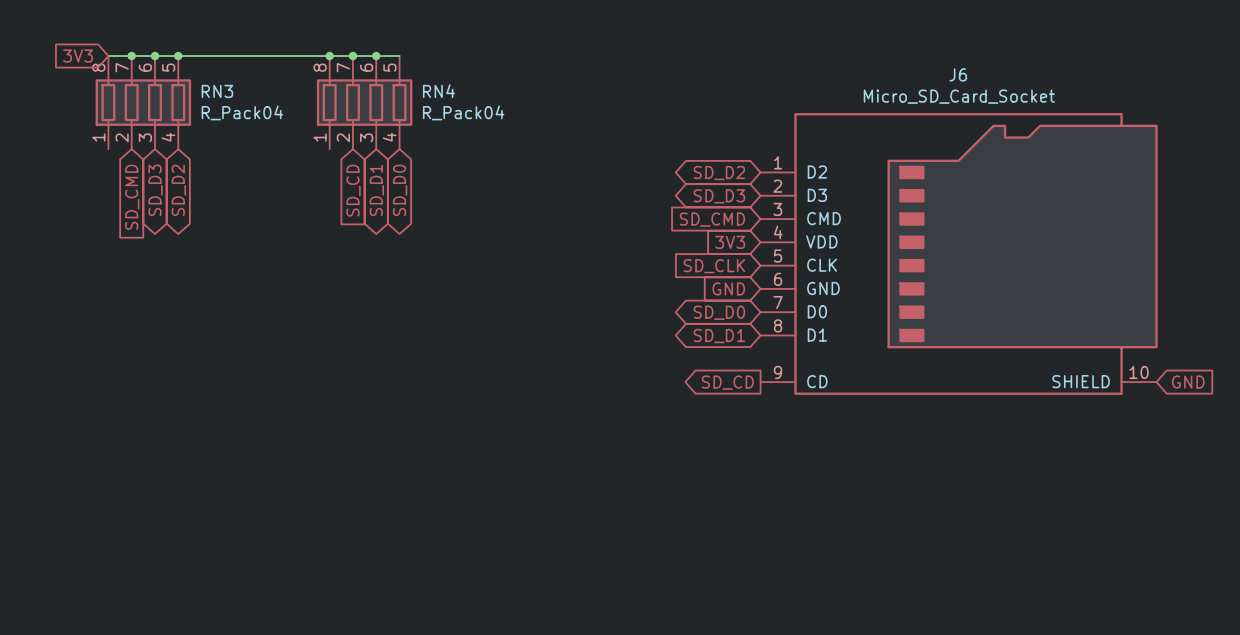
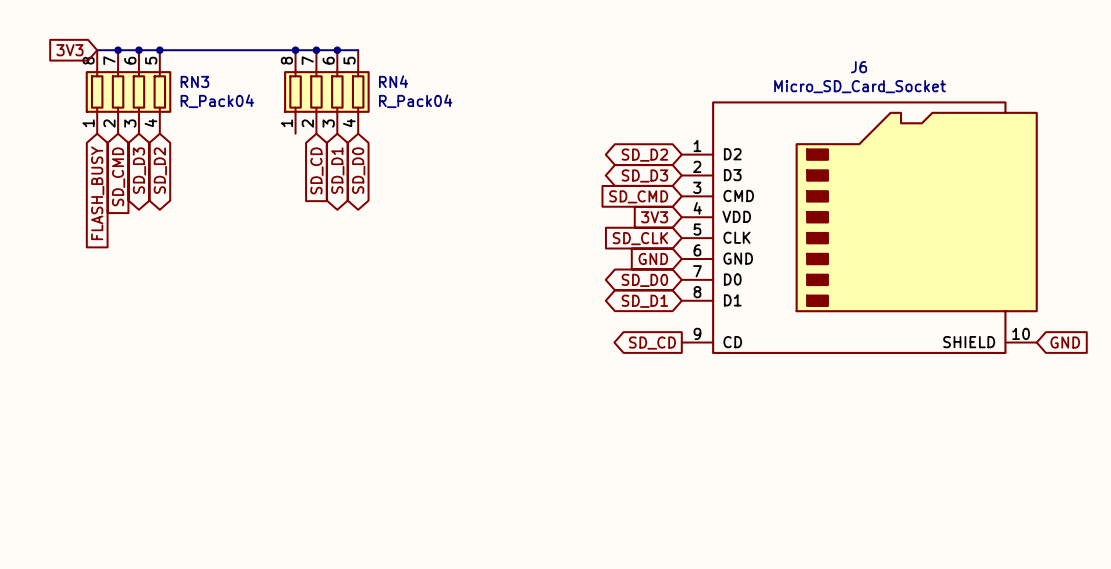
global label: none -> FLASH_BUSY (97, 193)

